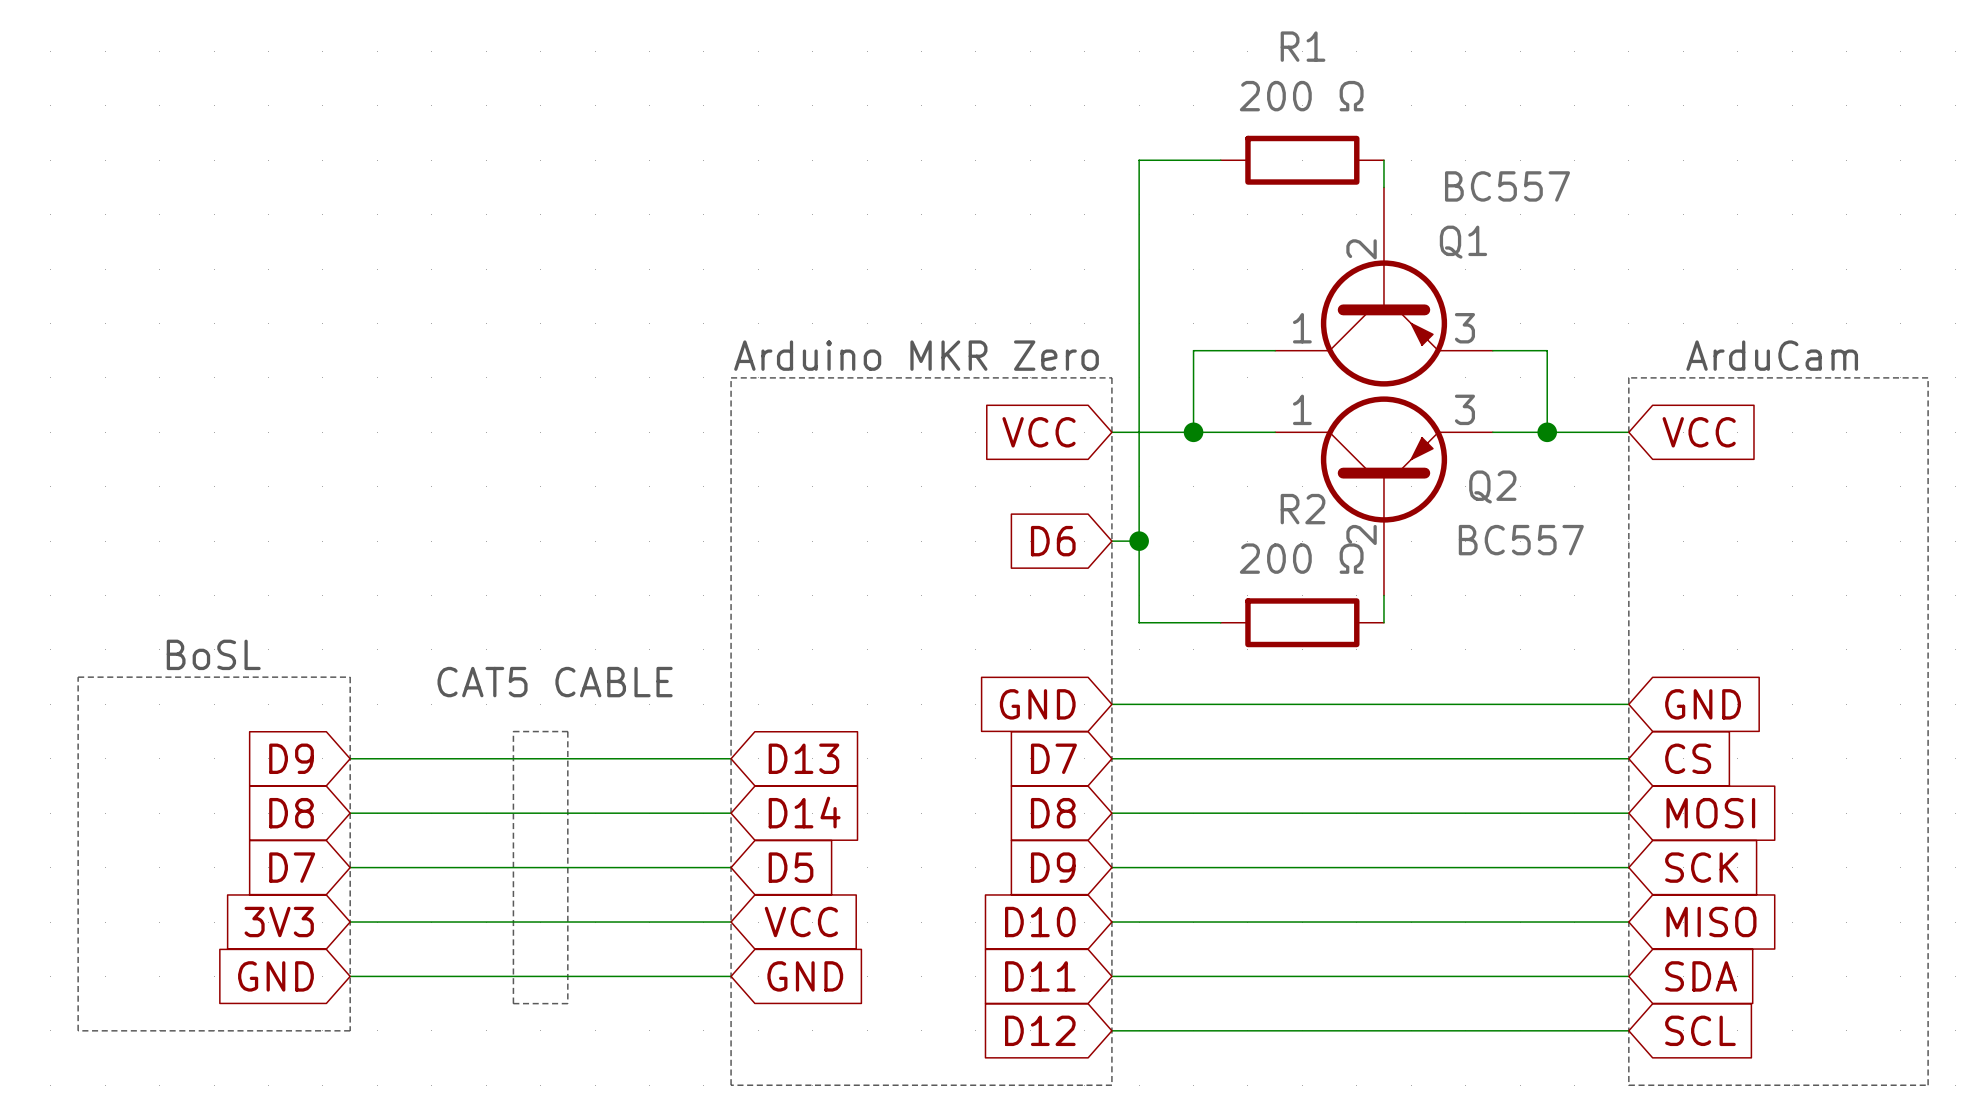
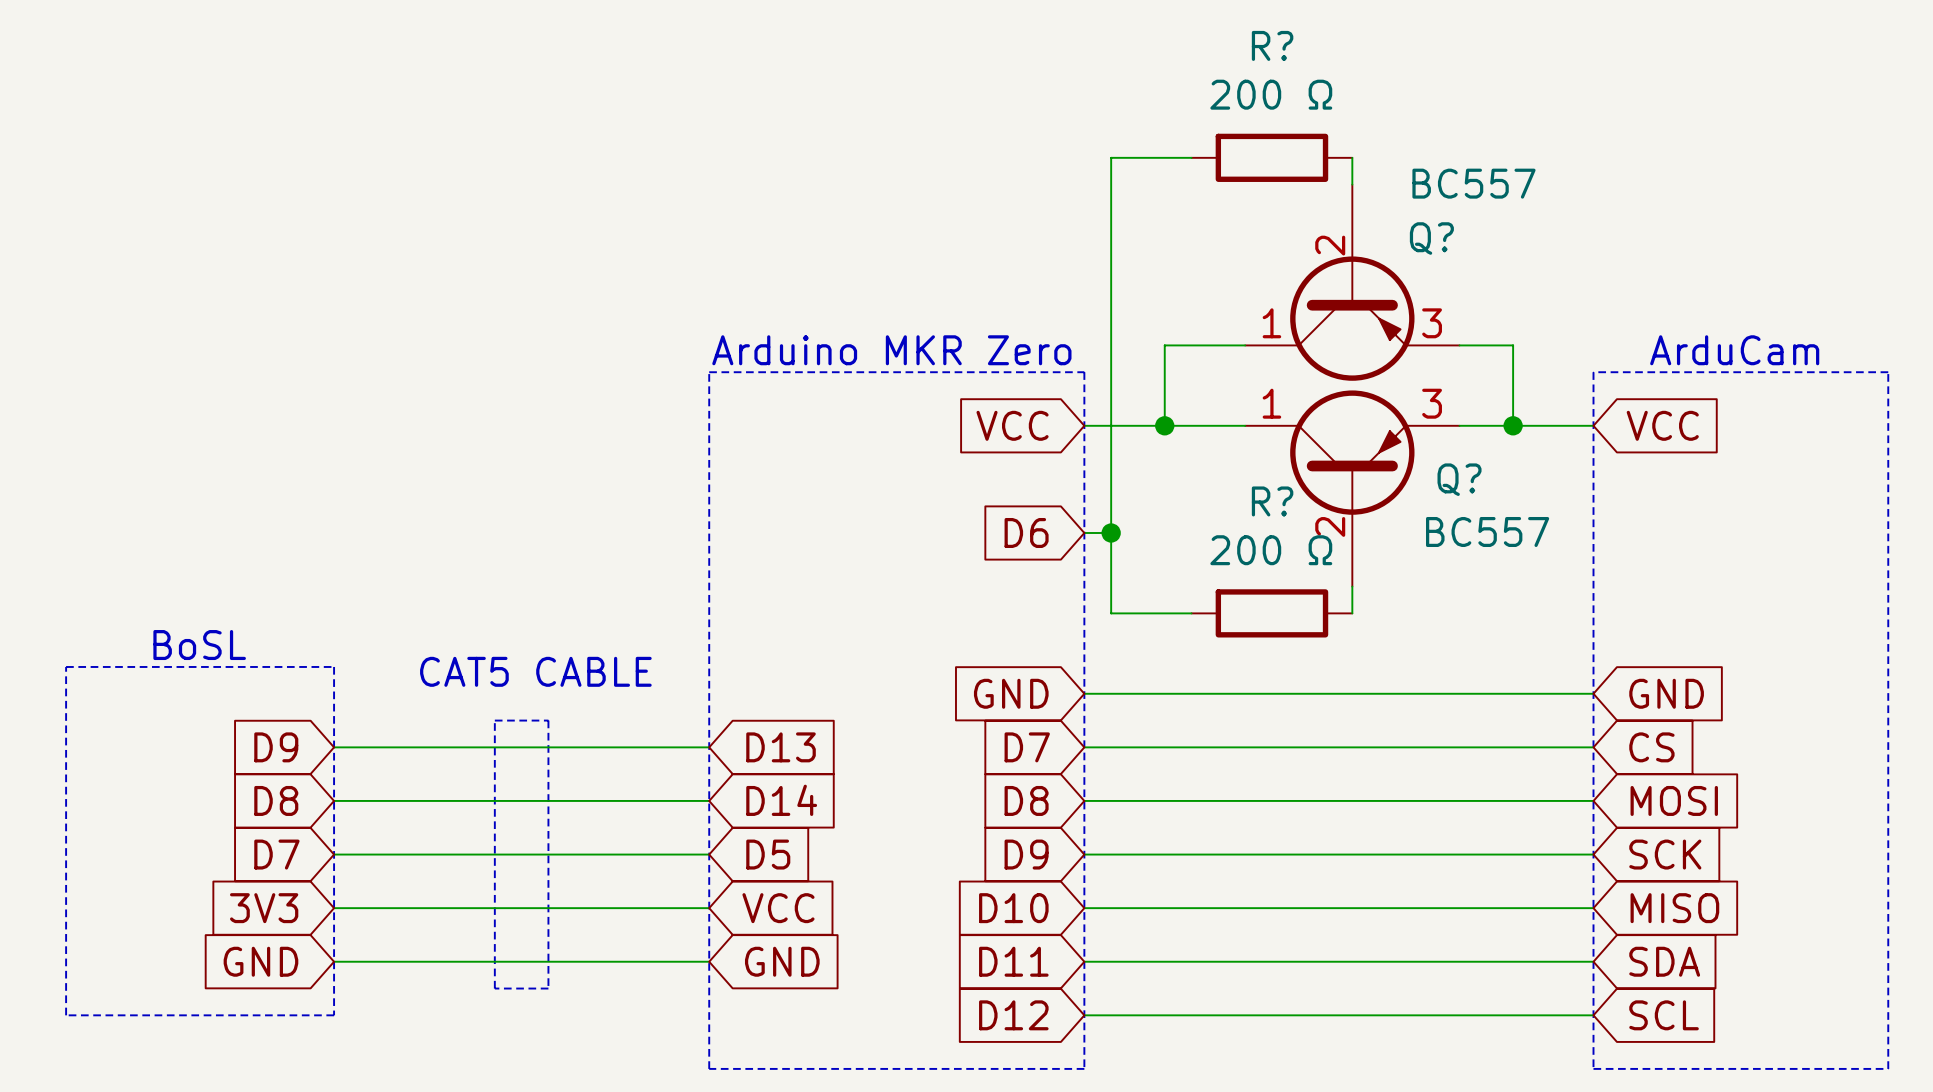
R1 name: R1 (1303, 46) -> R? (1272, 45)
Q1 name: Q1 (1463, 242) -> Q? (1431, 238)
Q2 name: Q2 (1492, 486) -> Q? (1459, 479)
R2 name: R2 (1303, 509) -> R? (1272, 501)

